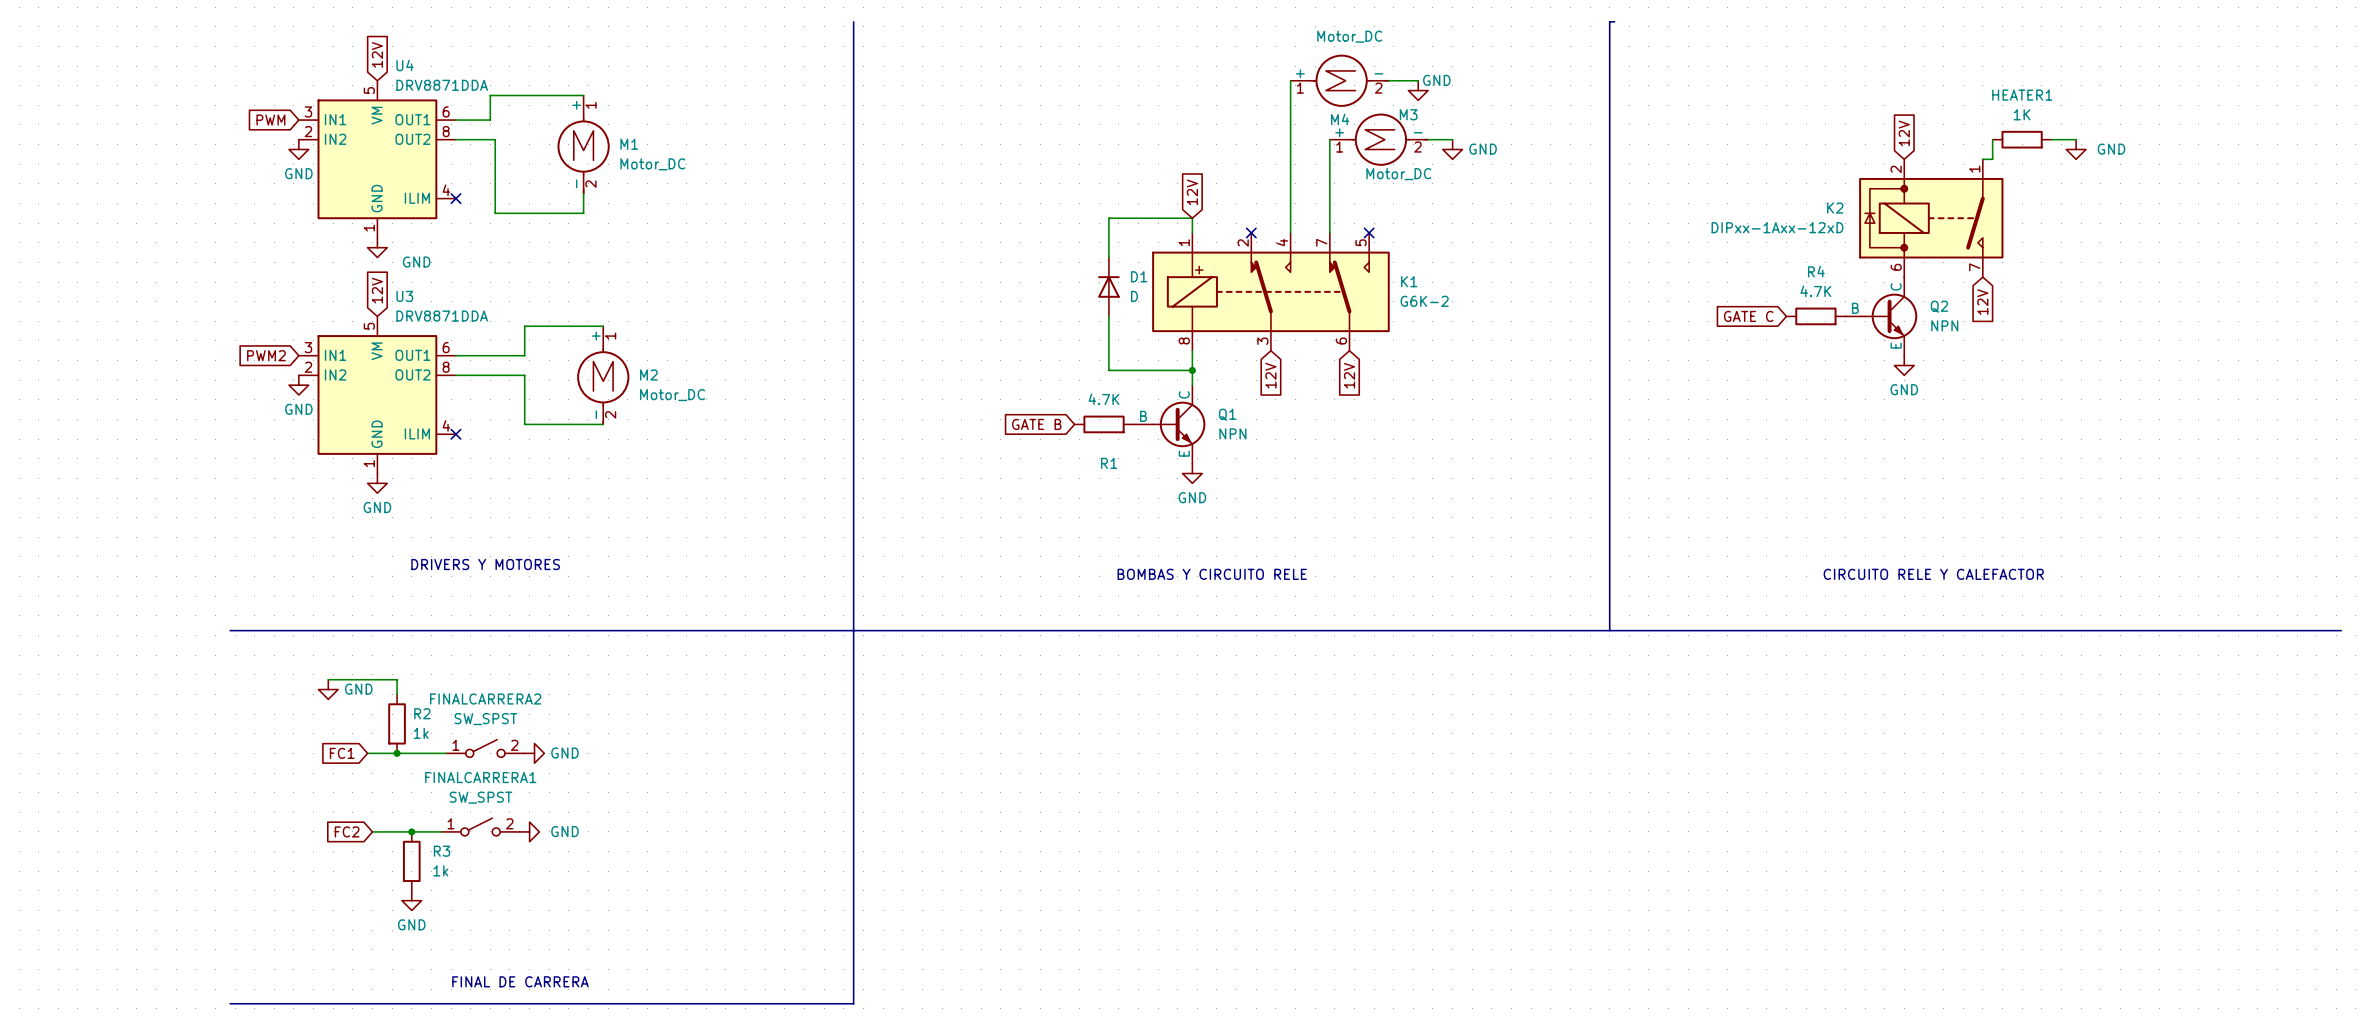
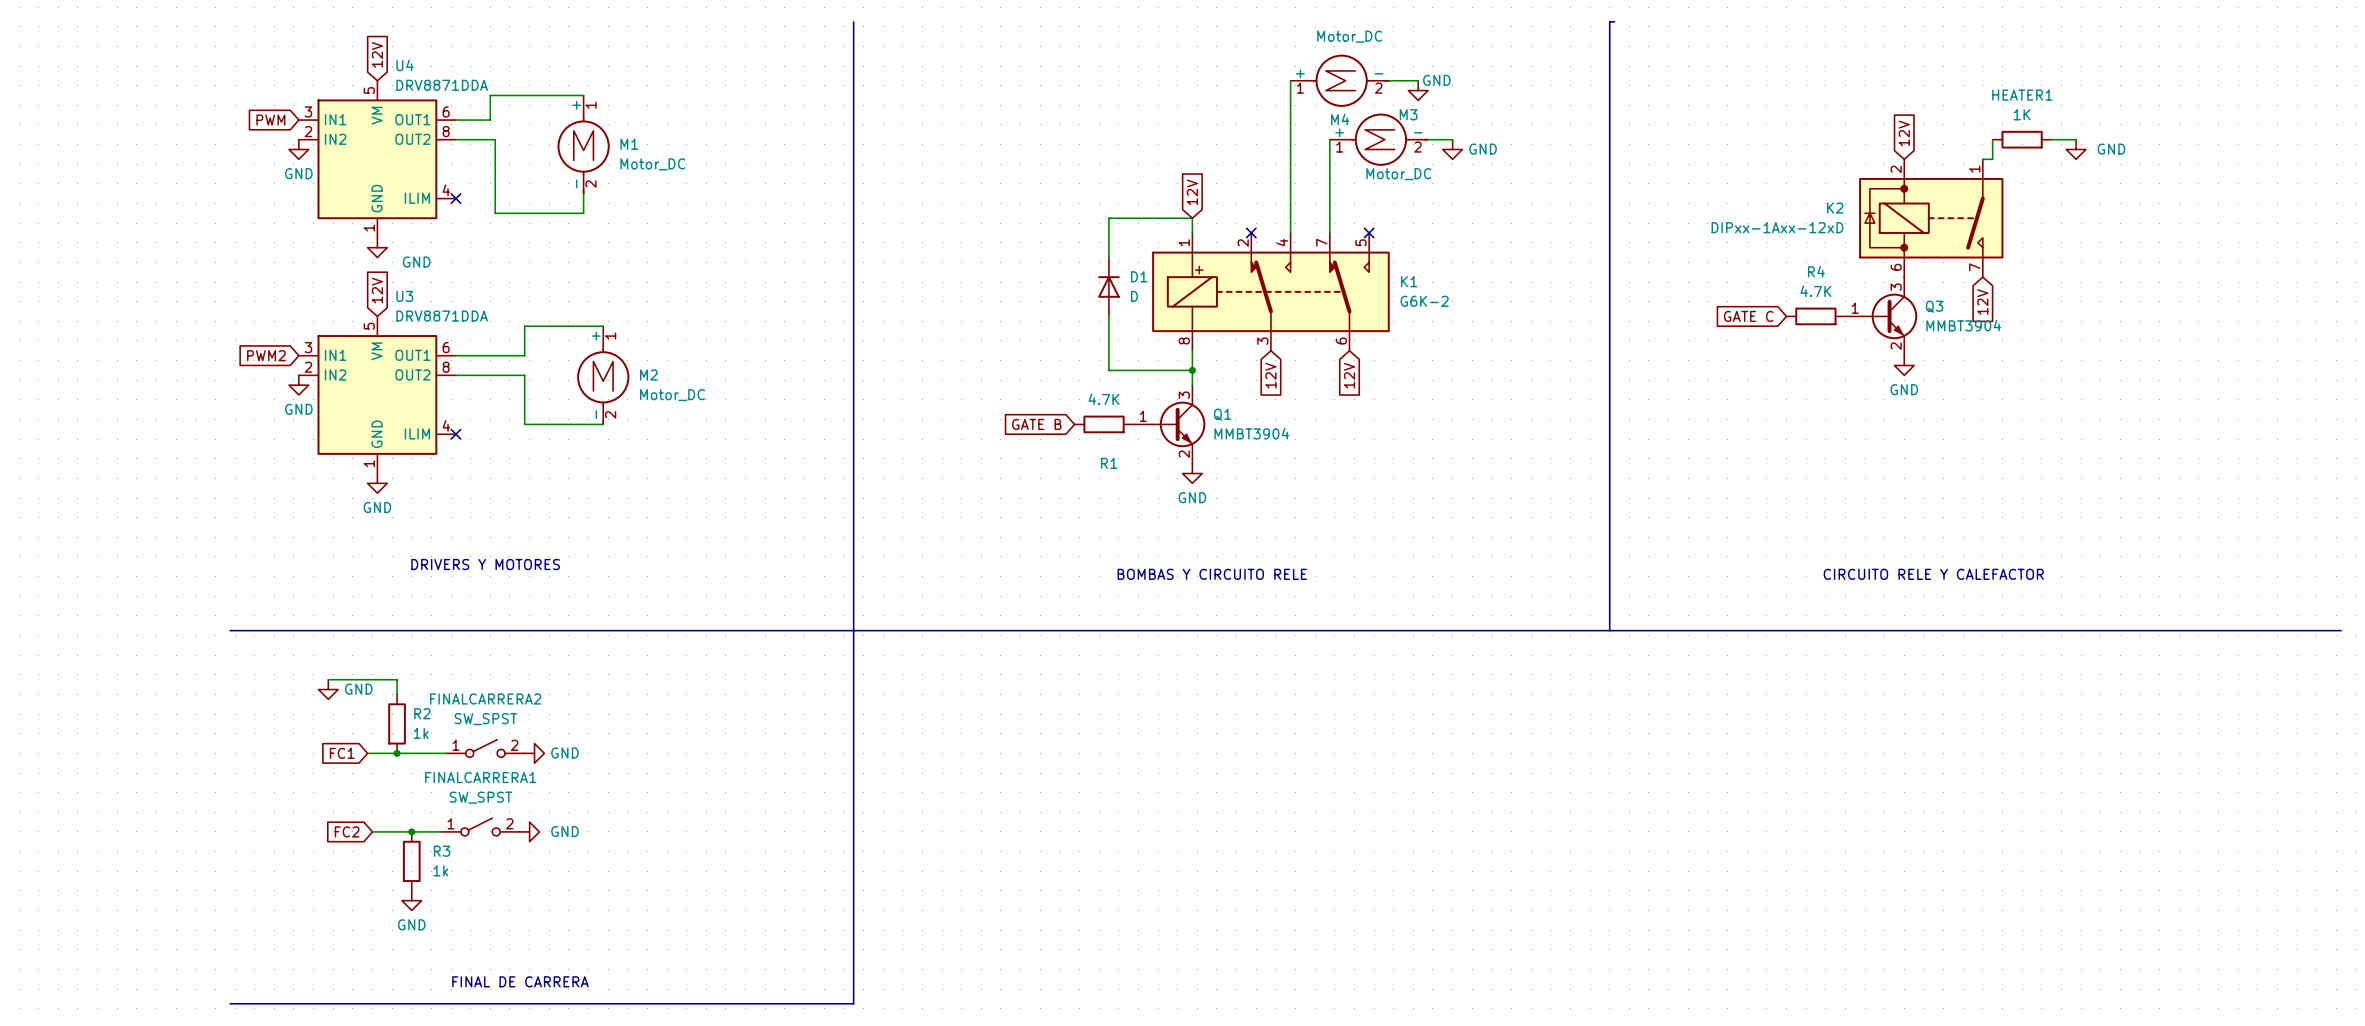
Q2: NPN (1881, 316) -> none
Q3: none -> MMBT3904 (1881, 316)
Q1 symbol: [1133, 385, 1206, 464] -> [1133, 385, 1206, 464]
Q1 value: NPN (1232, 433) -> MMBT3904 (1251, 433)

